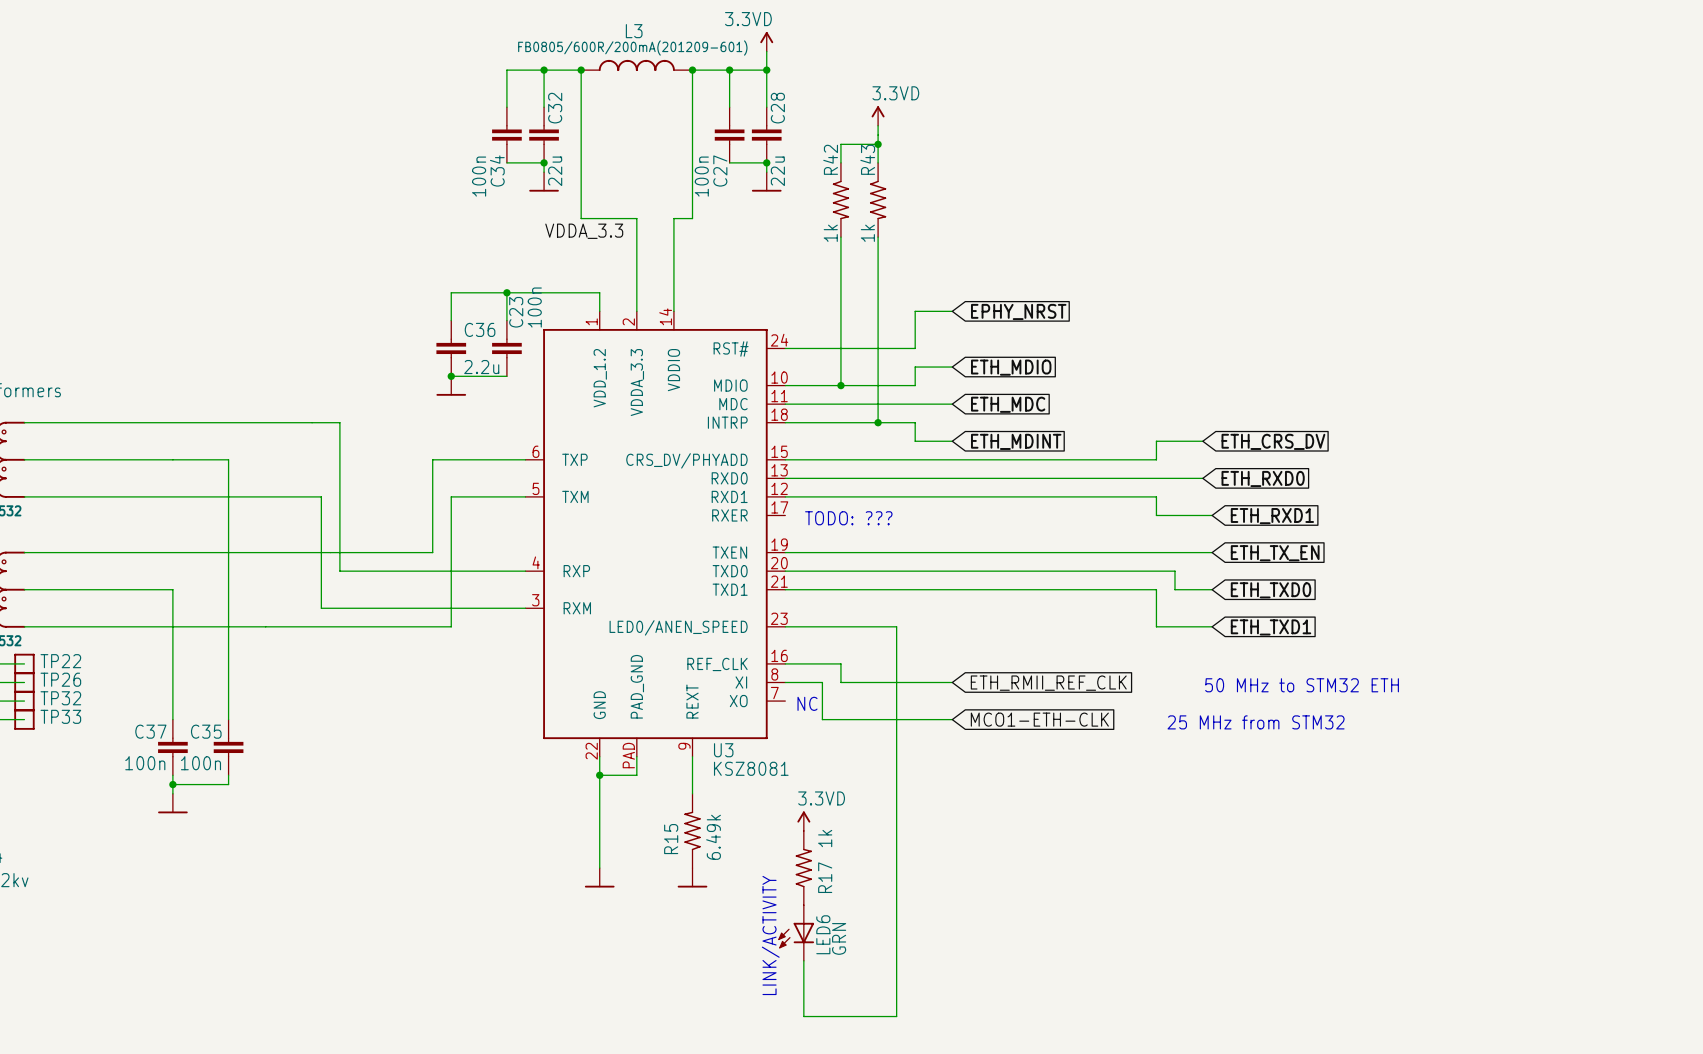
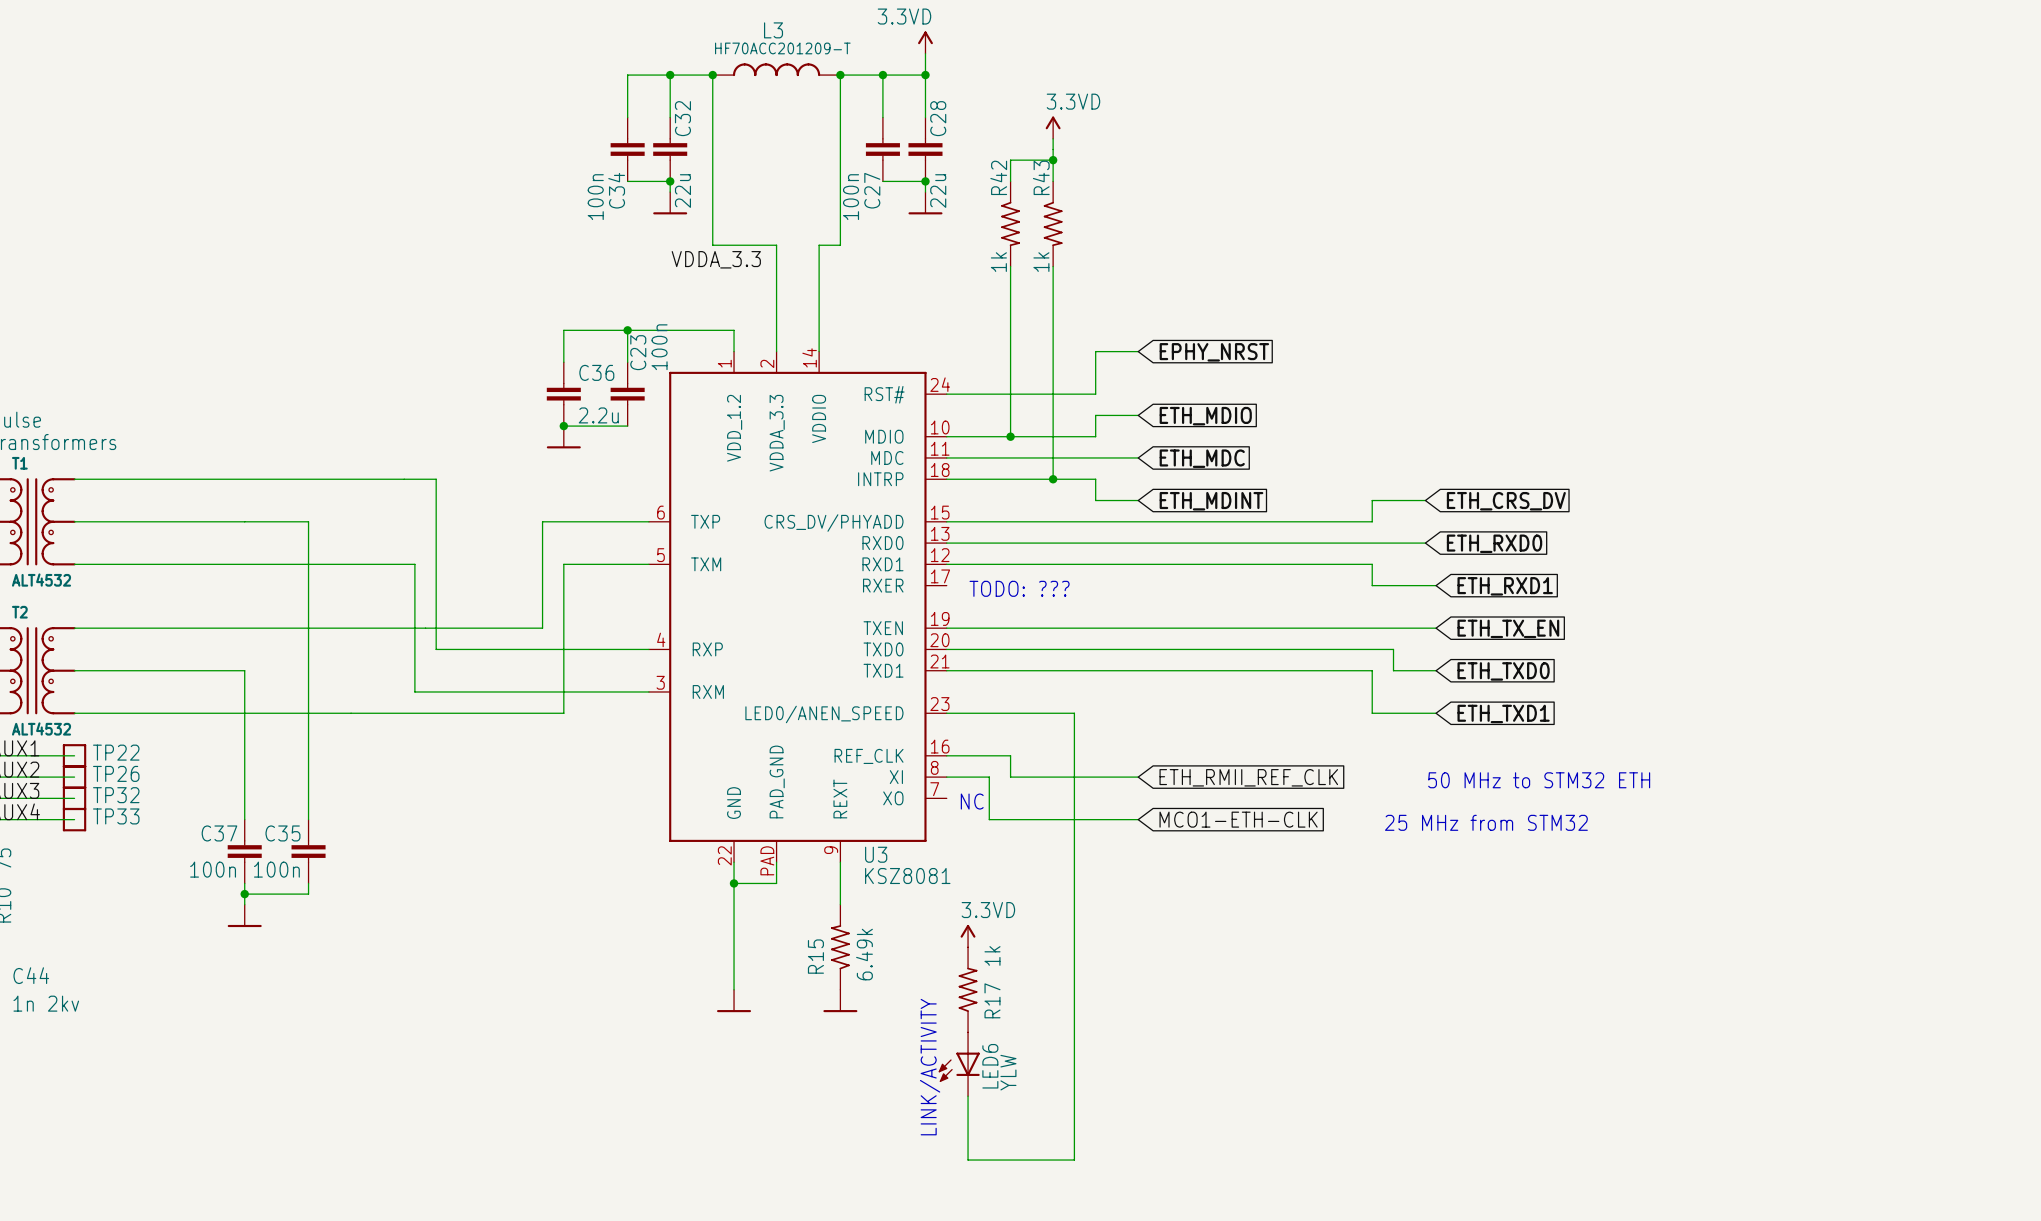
L3 value: FB0805/600R/200mA(201209-601) (632, 48) -> HF70ACC201209-T (782, 48)
LED6 value: GRN (839, 938) -> YLW (1008, 1072)

